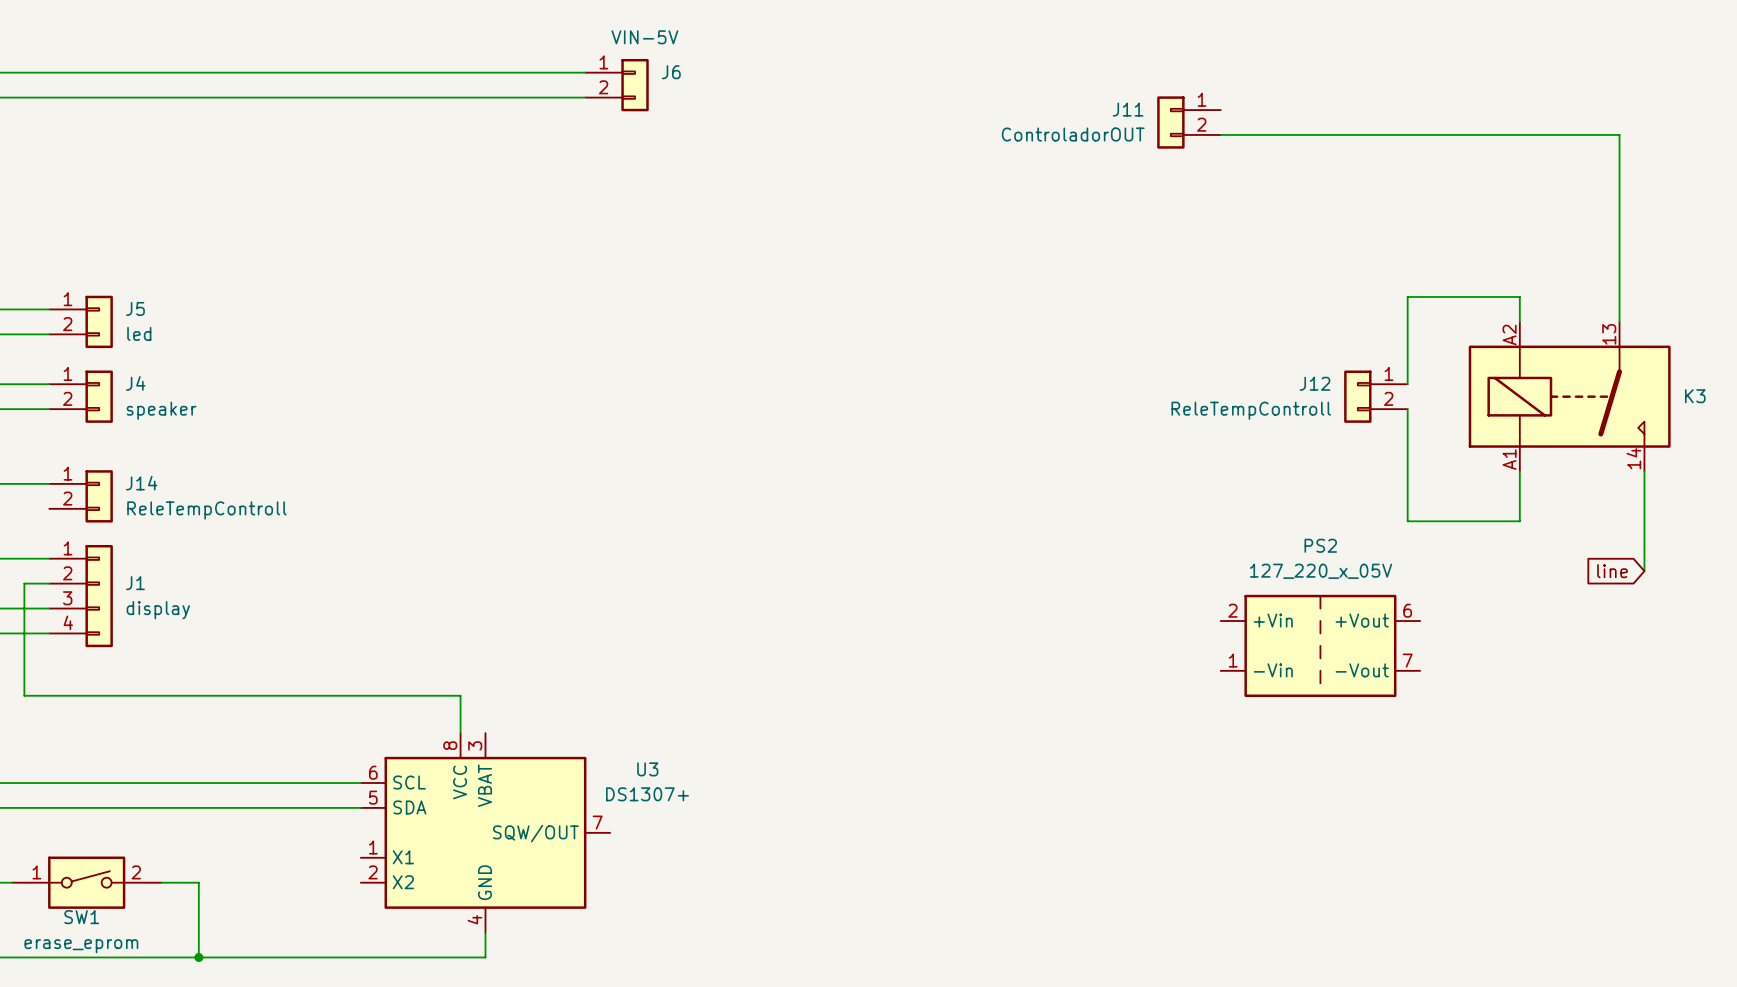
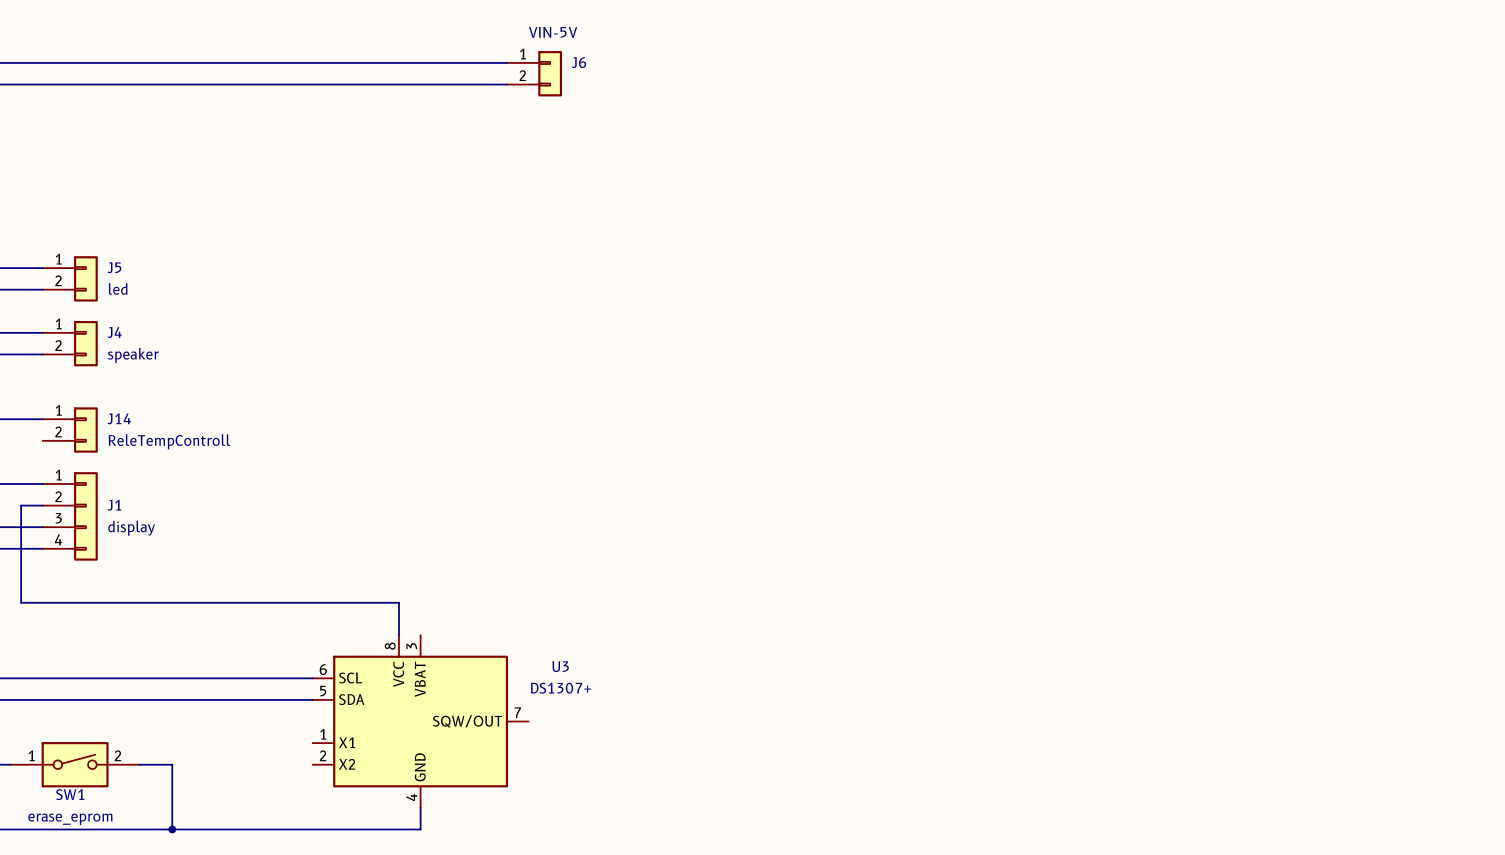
J11: ControladorOUT (1188, 122) -> none
wire: (1220, 134) (1619, 134) (1619, 321) -> none
wire: (1519, 321) (1519, 296) (1407, 296) (1407, 384) -> none
J12: ReleTempControll (1375, 396) -> none
K3: (1569, 396) -> none
wire: (1407, 409) (1407, 521) (1519, 521) (1519, 471) -> none
wire: (1644, 471) (1644, 571) -> none
global label: line (1612, 571) -> none
PS2: 127_220_x_05V (1320, 645) -> none

